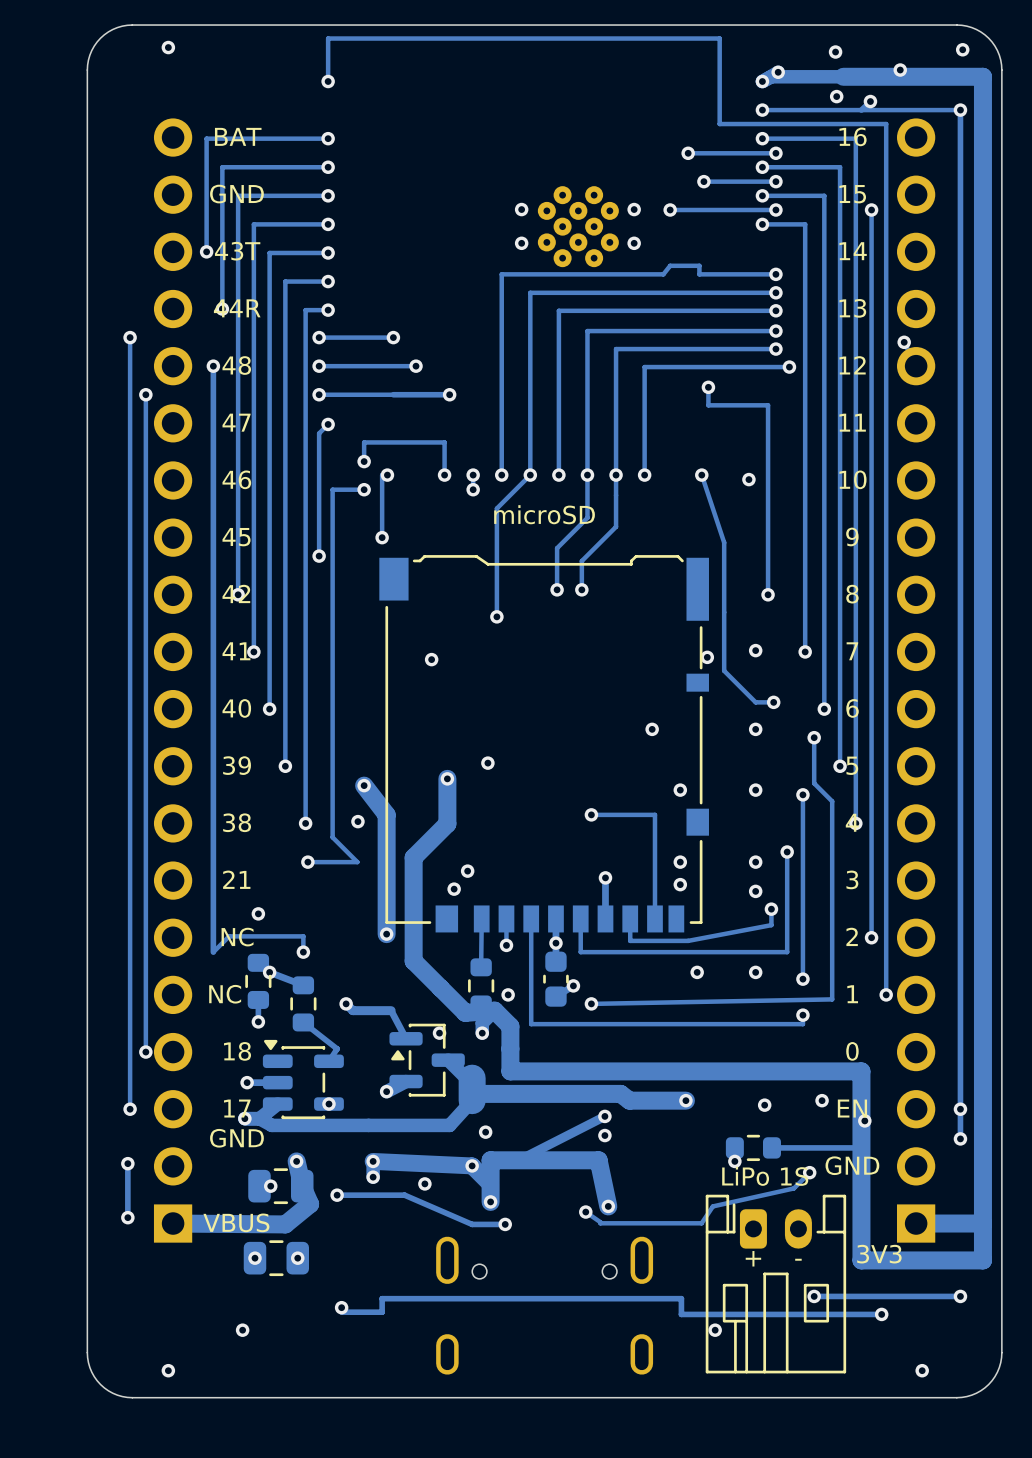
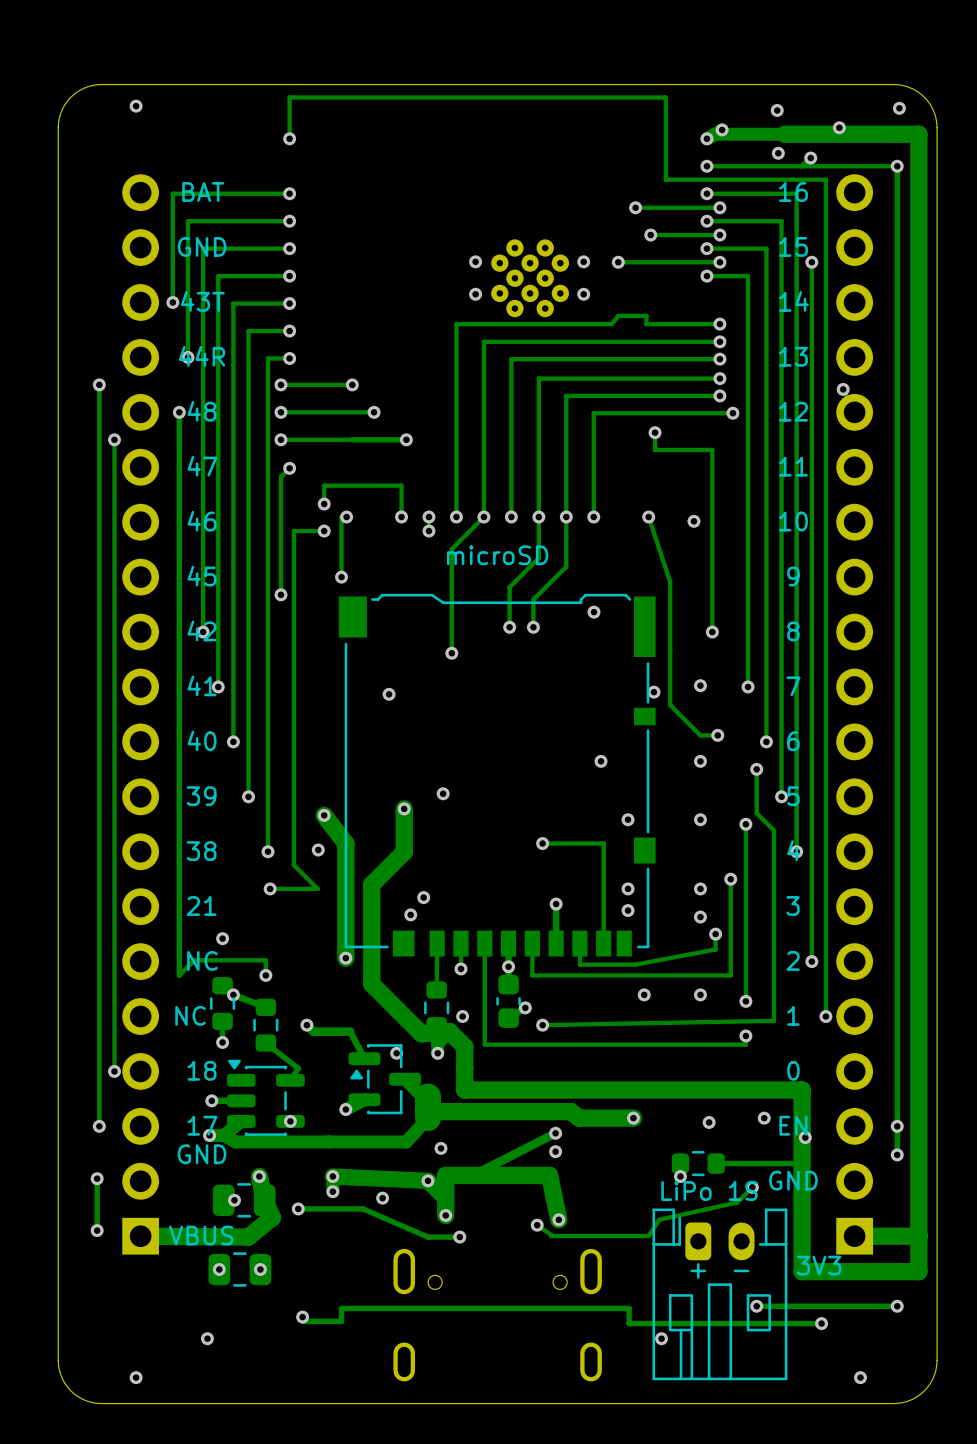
via: none -> (593, 612)

